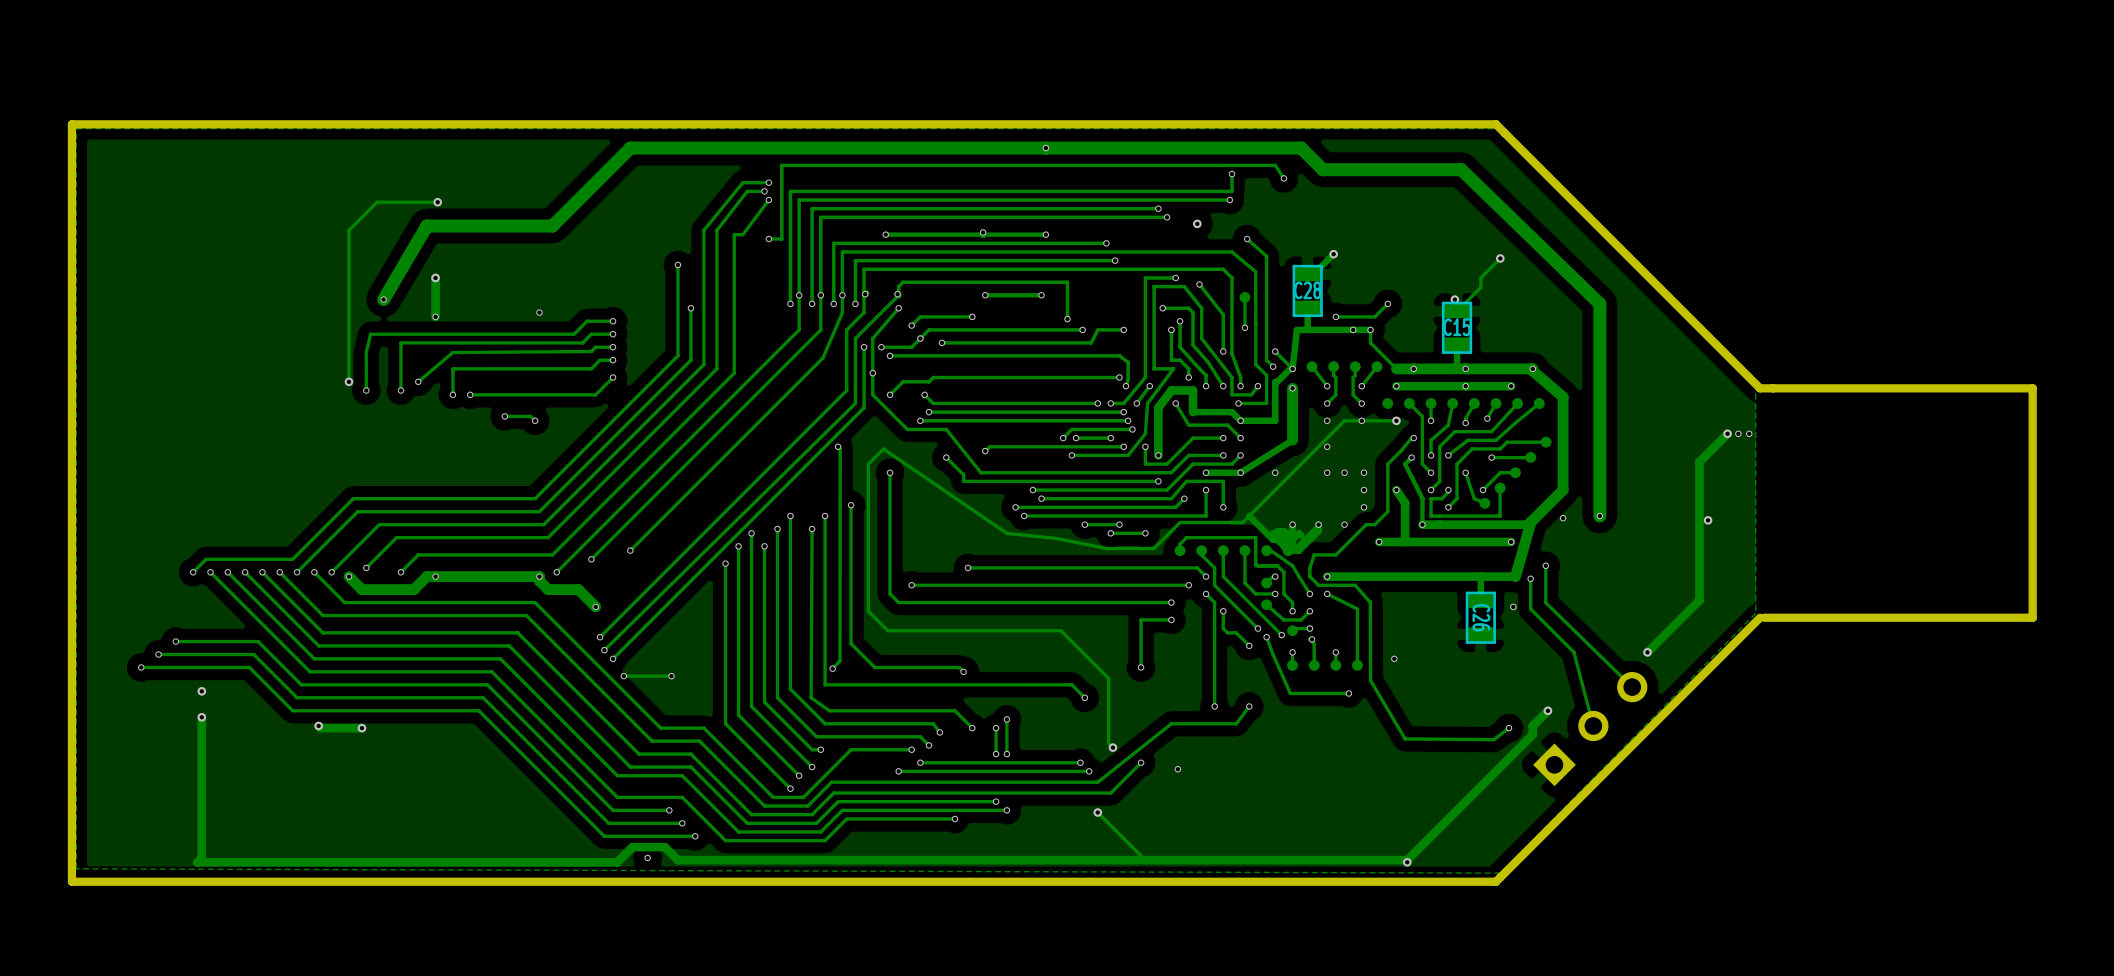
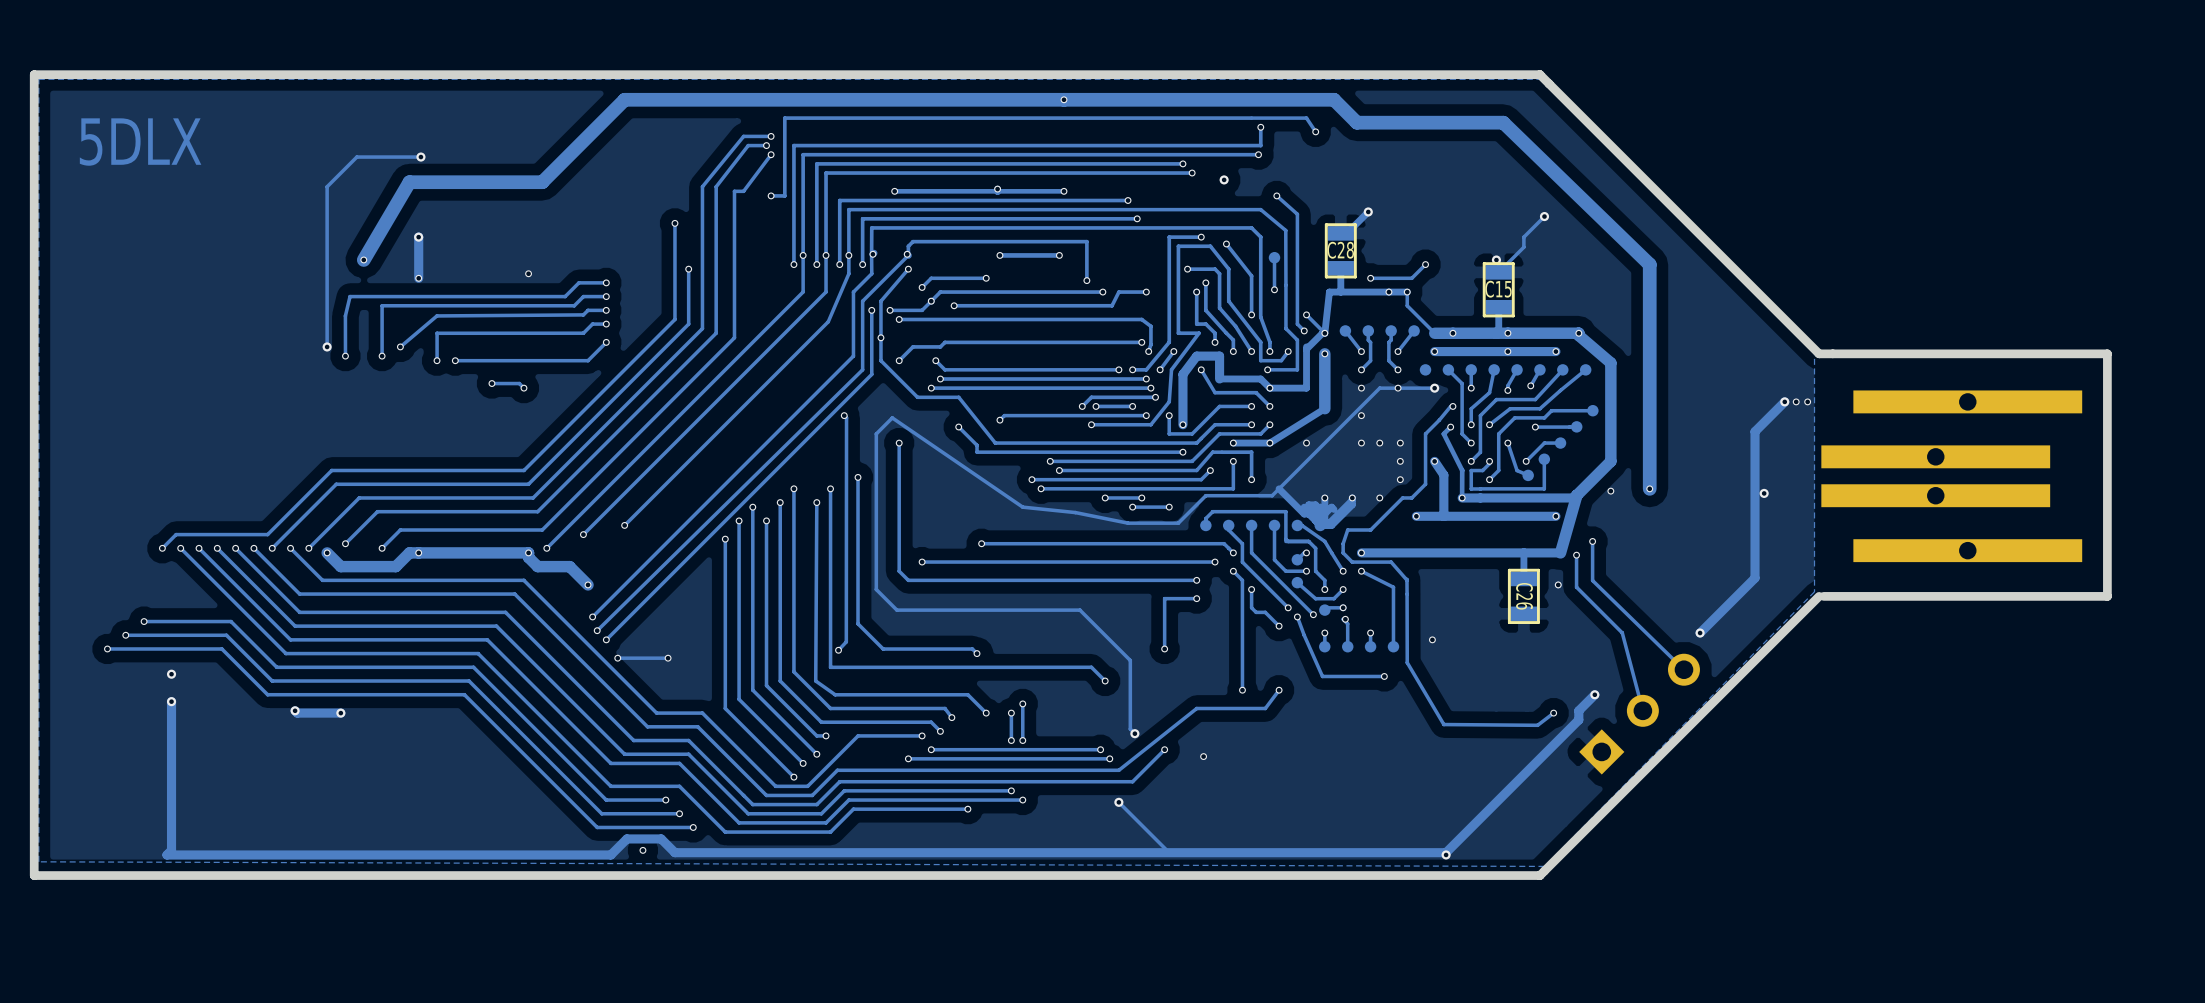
text: none -> 5DLX (140, 142)
part: none -> (1951, 476)

